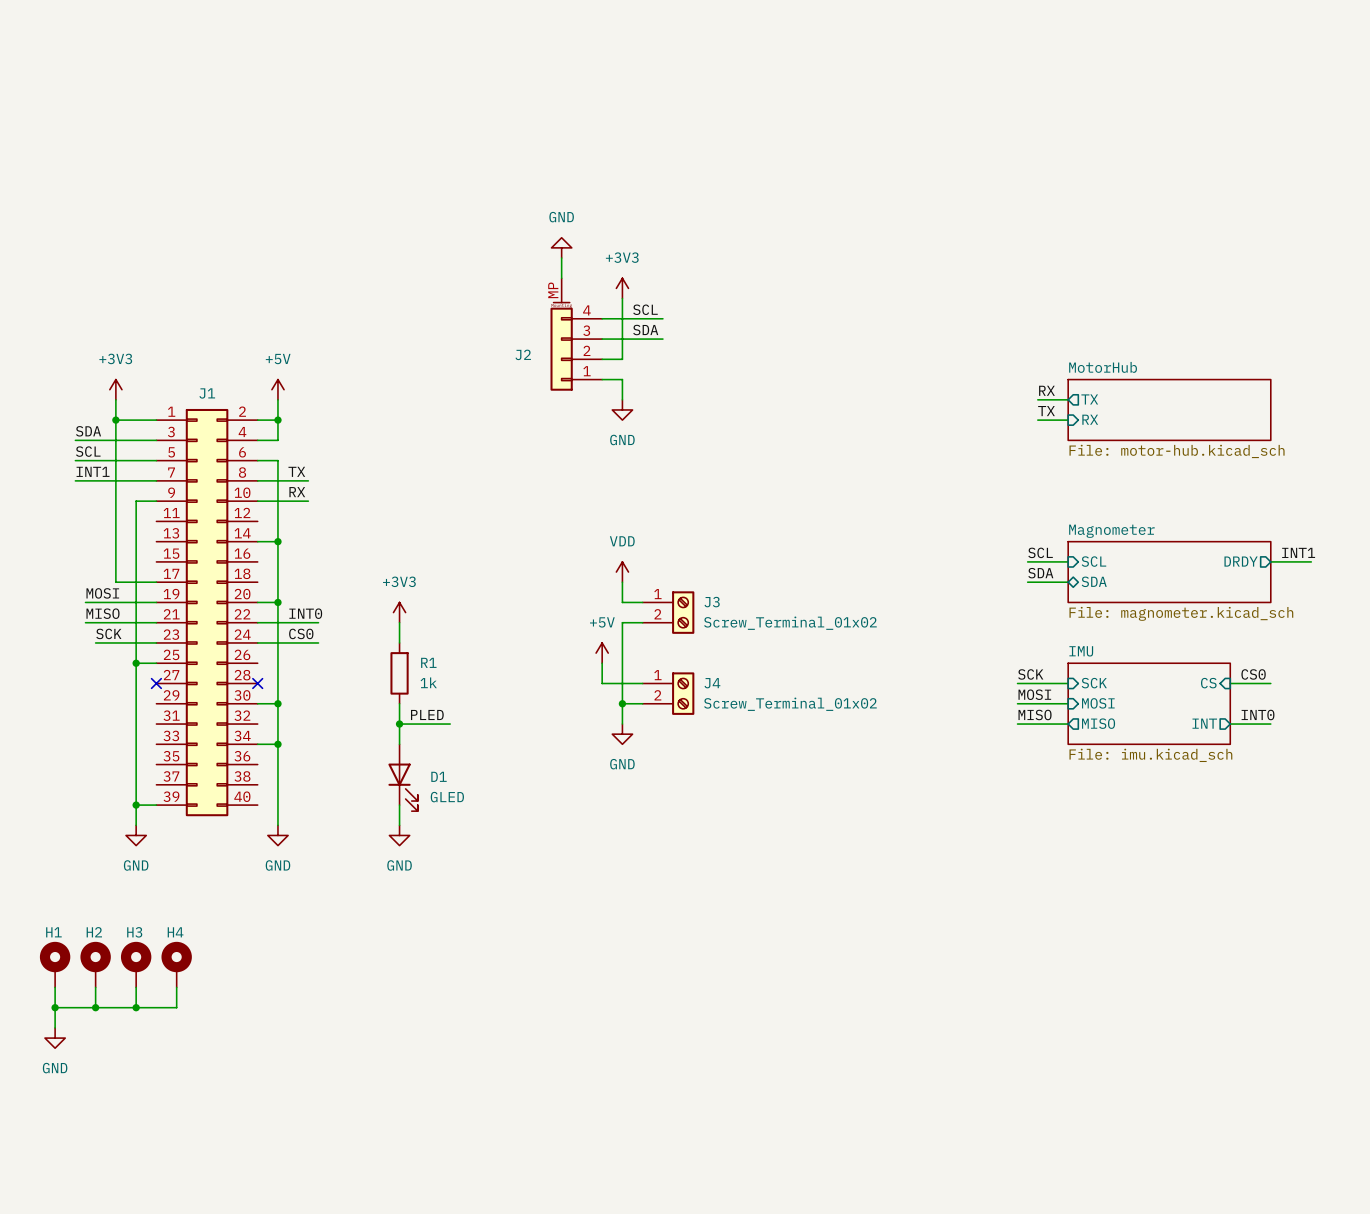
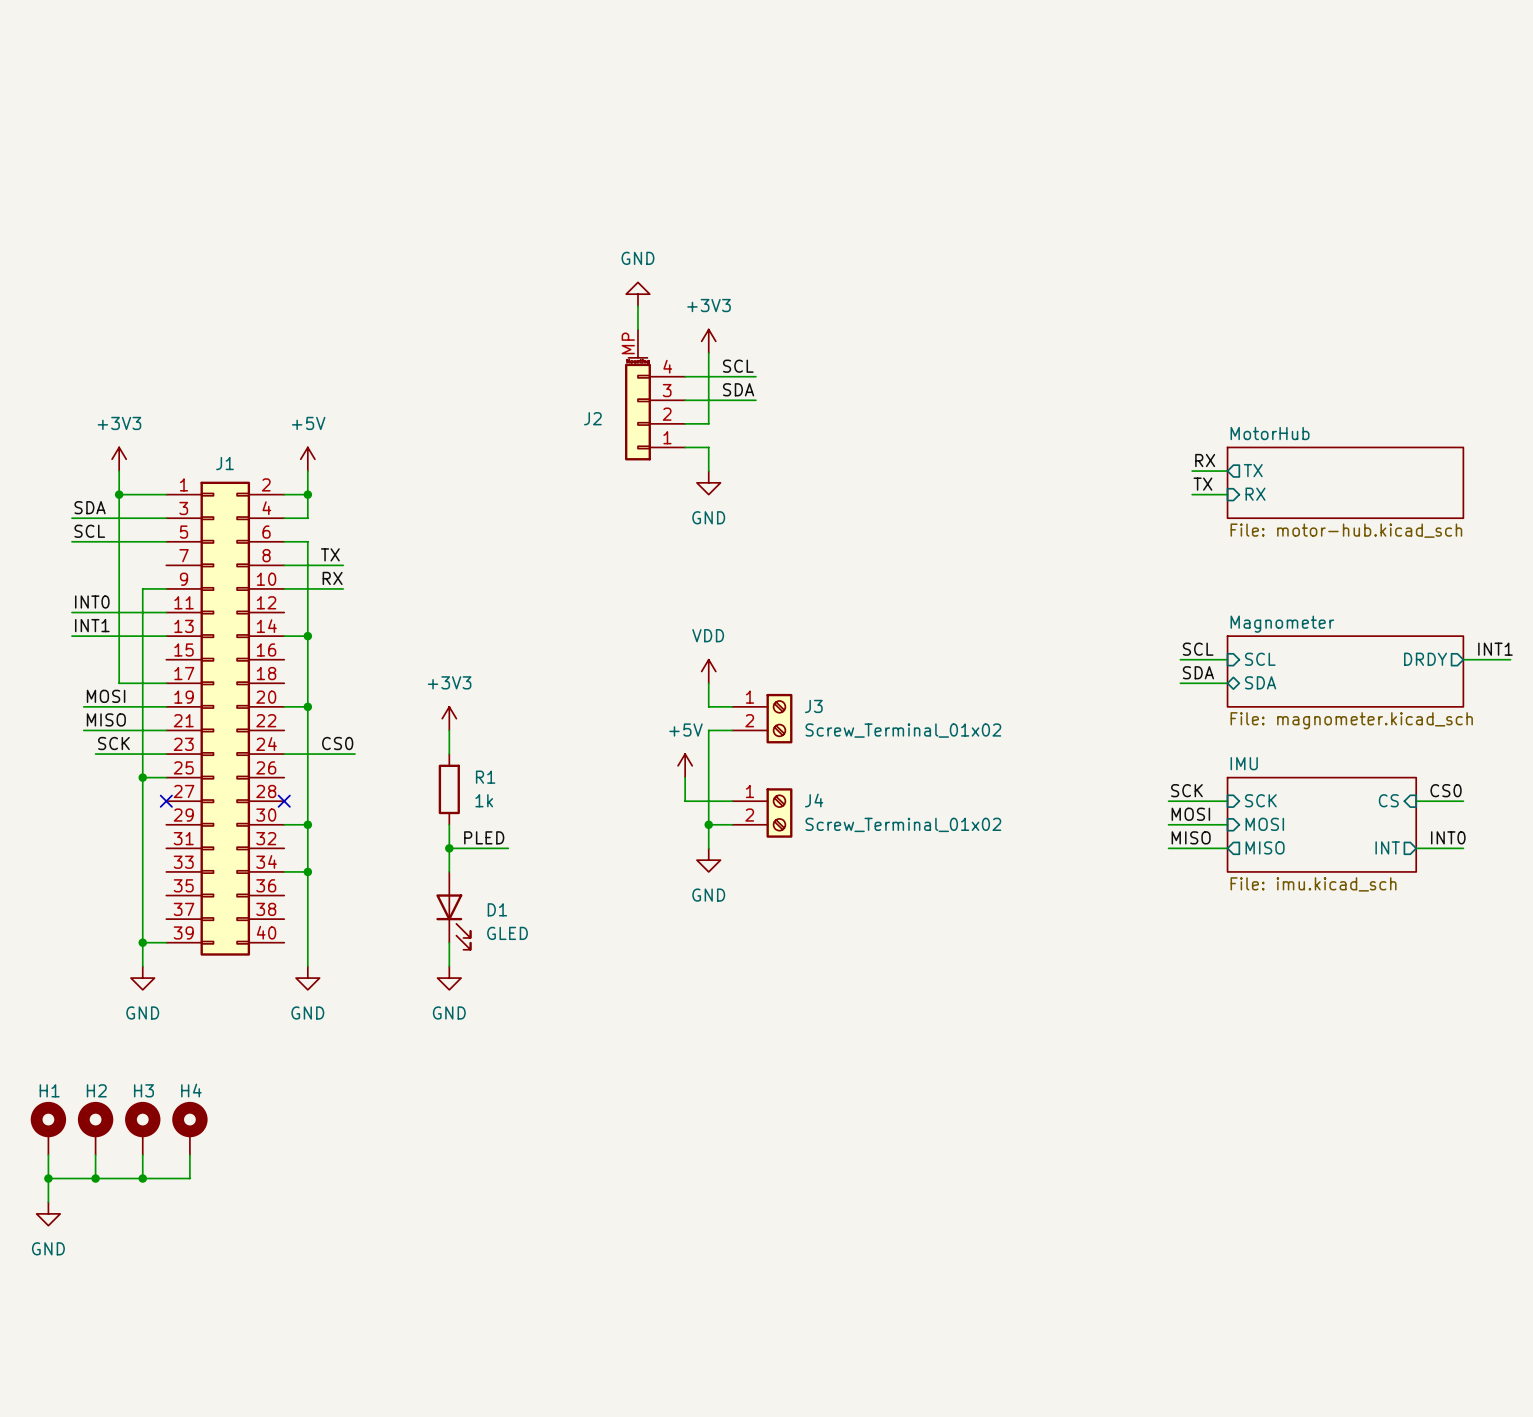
label position: INT1 (93, 471) -> INT1 (92, 625)
wire: (75, 480) (156, 480) -> (72, 612) (166, 612)
label: none -> INT0 (92, 602)
wire: none -> (72, 636) (166, 636)
label: INT0 (305, 613) -> none
wire: (257, 622) (318, 622) -> none

